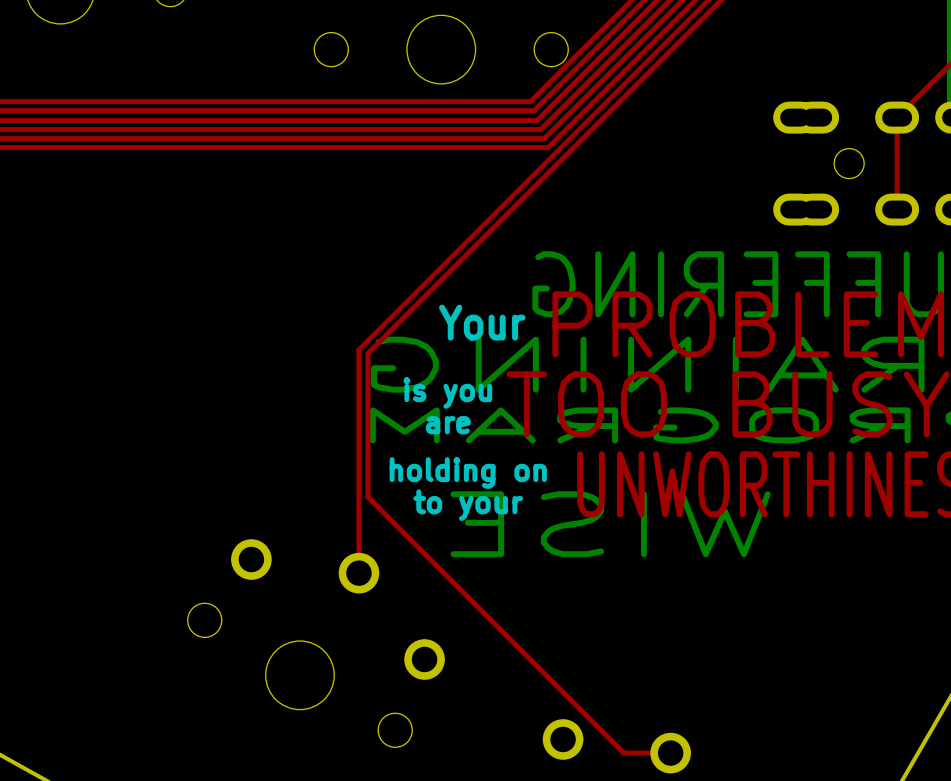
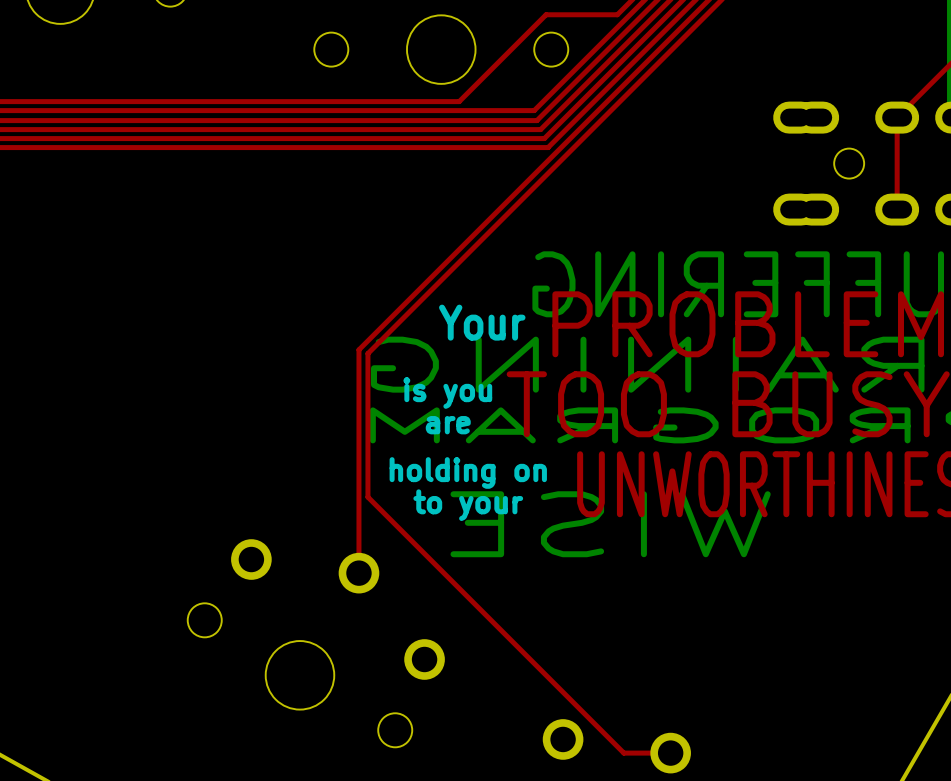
top track: (617, 14) (530, 101) (459, 101) -> (617, 14) (546, 14) (459, 101)

